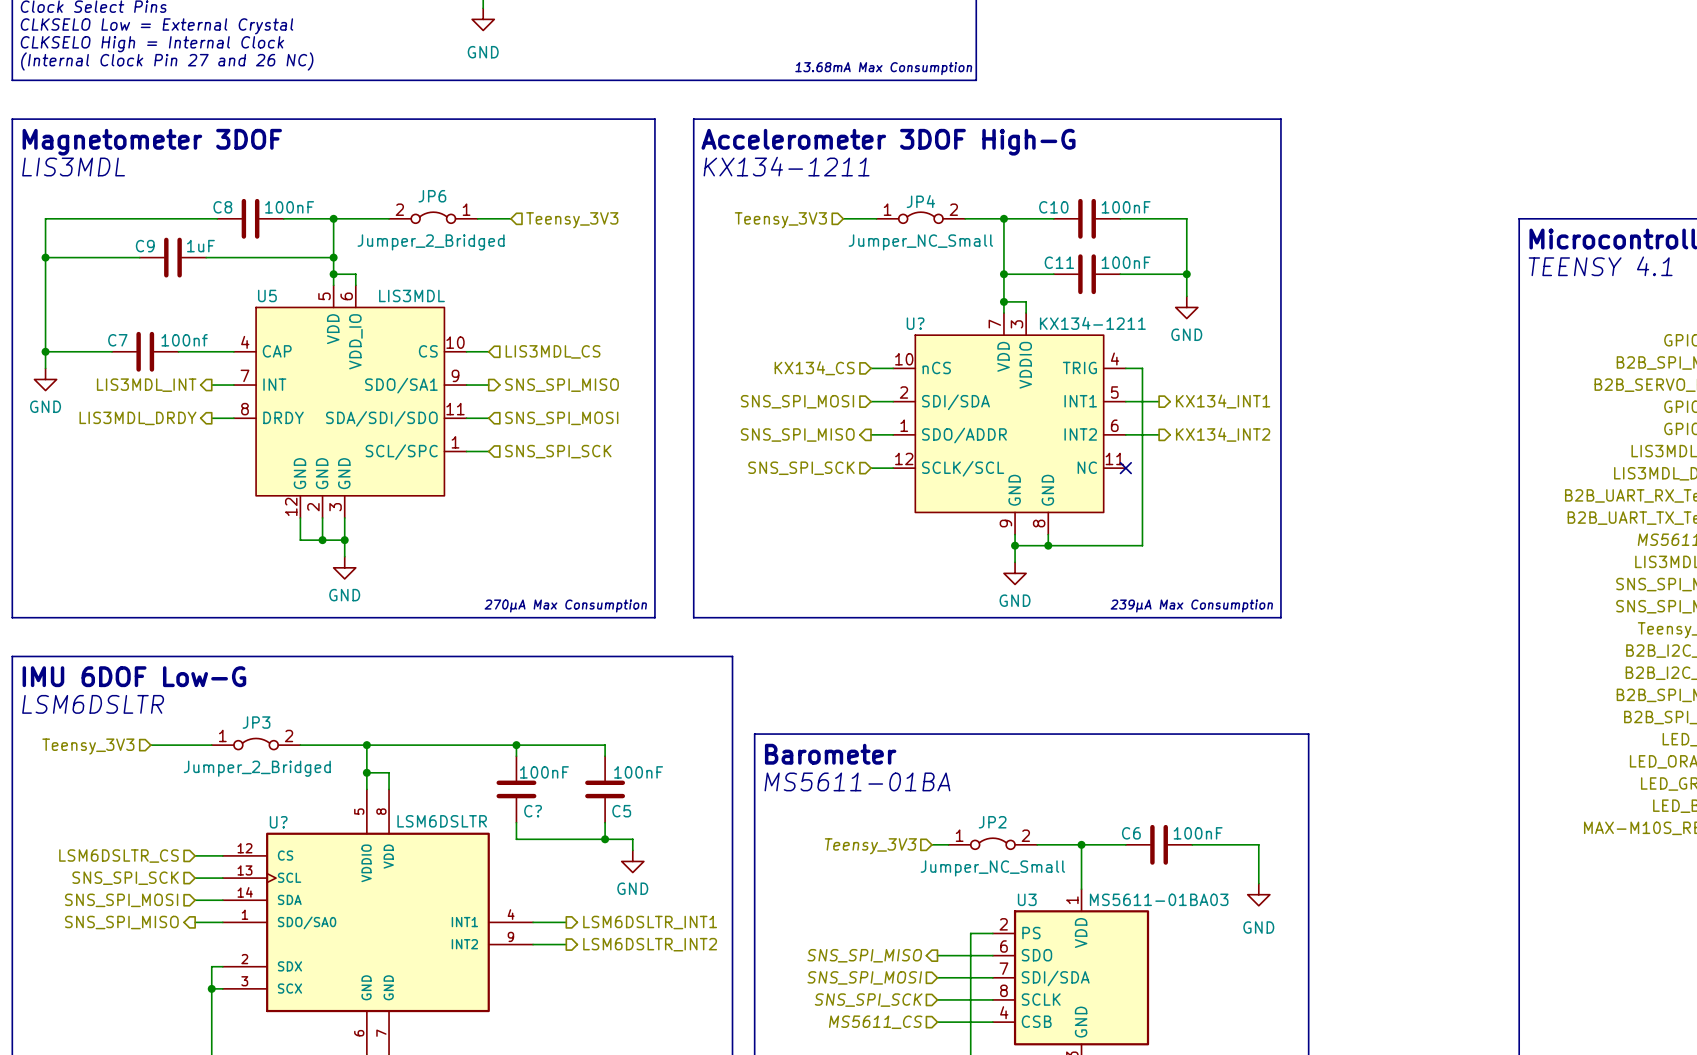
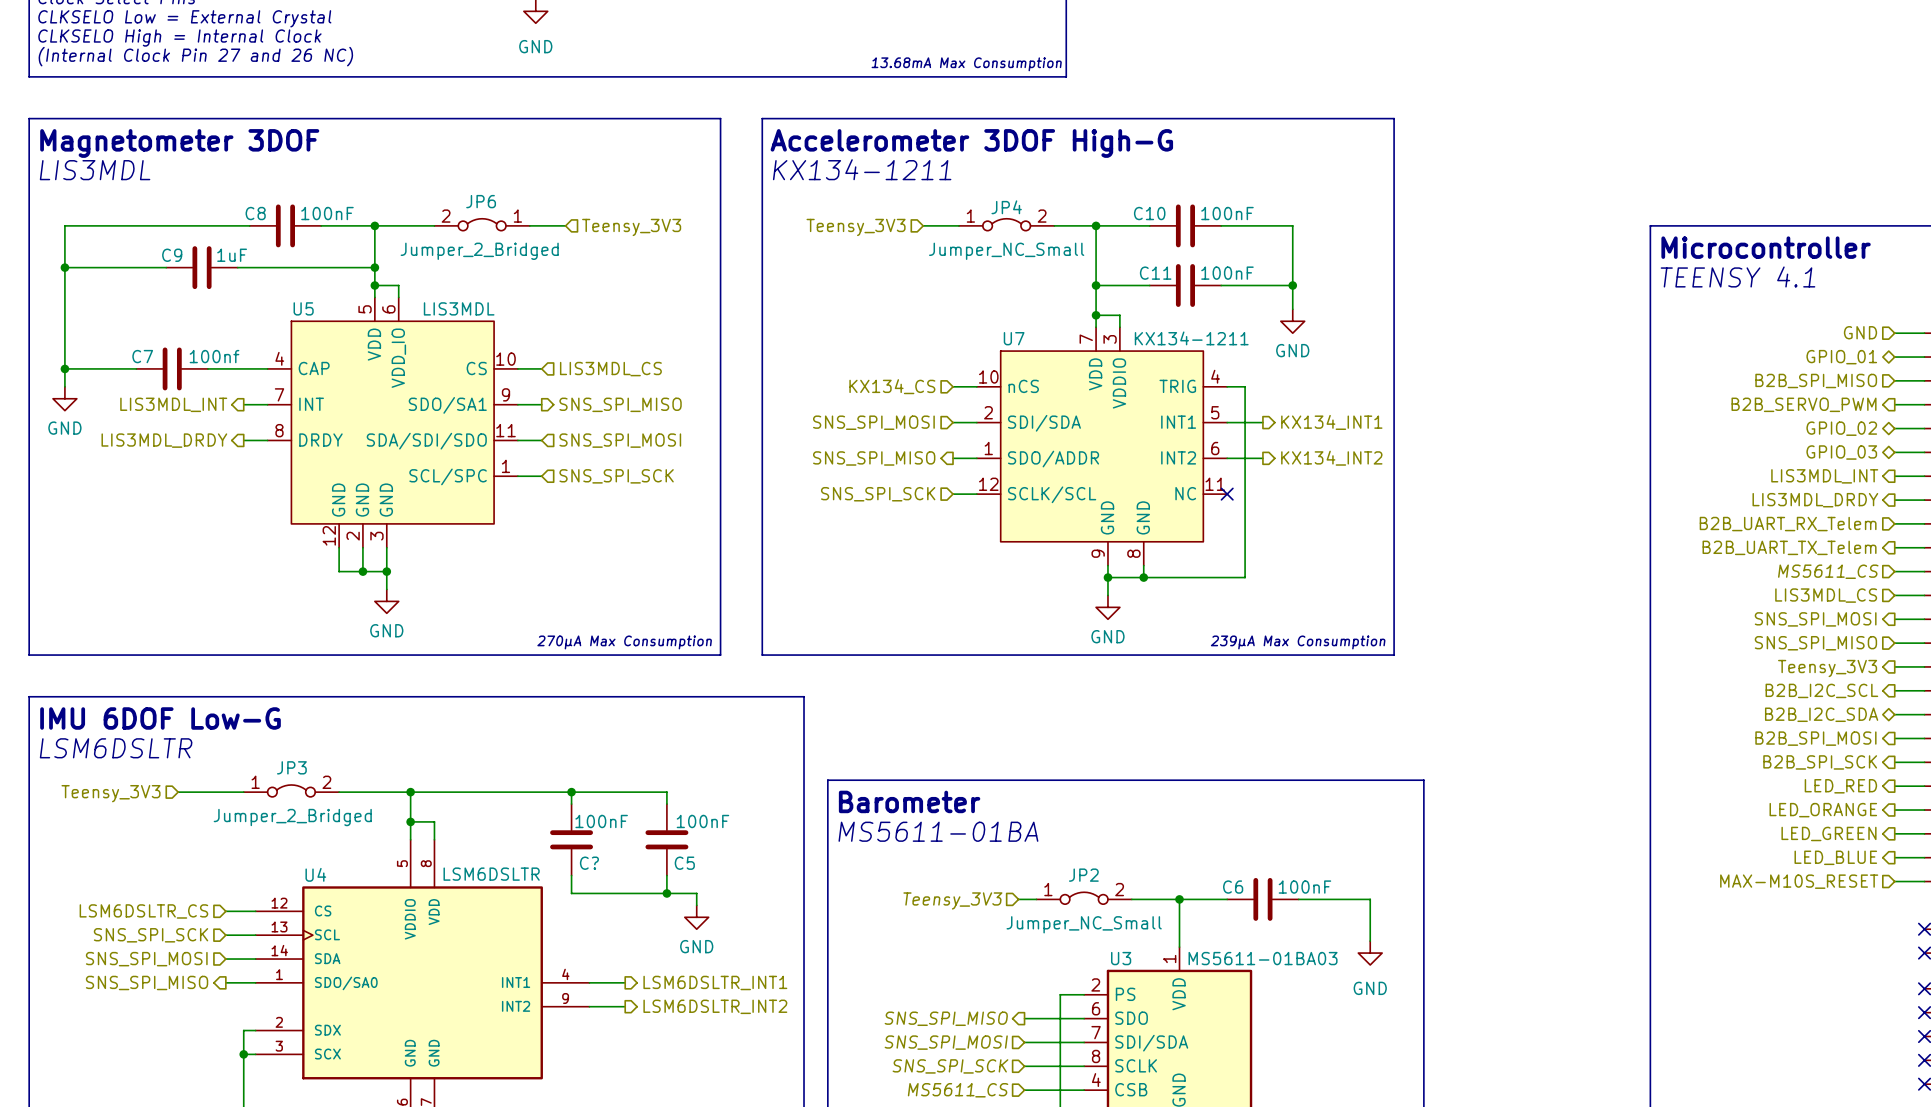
U? name: U? (915, 323) -> U7 (1014, 338)
U? name: U? (278, 822) -> U4 (315, 874)

